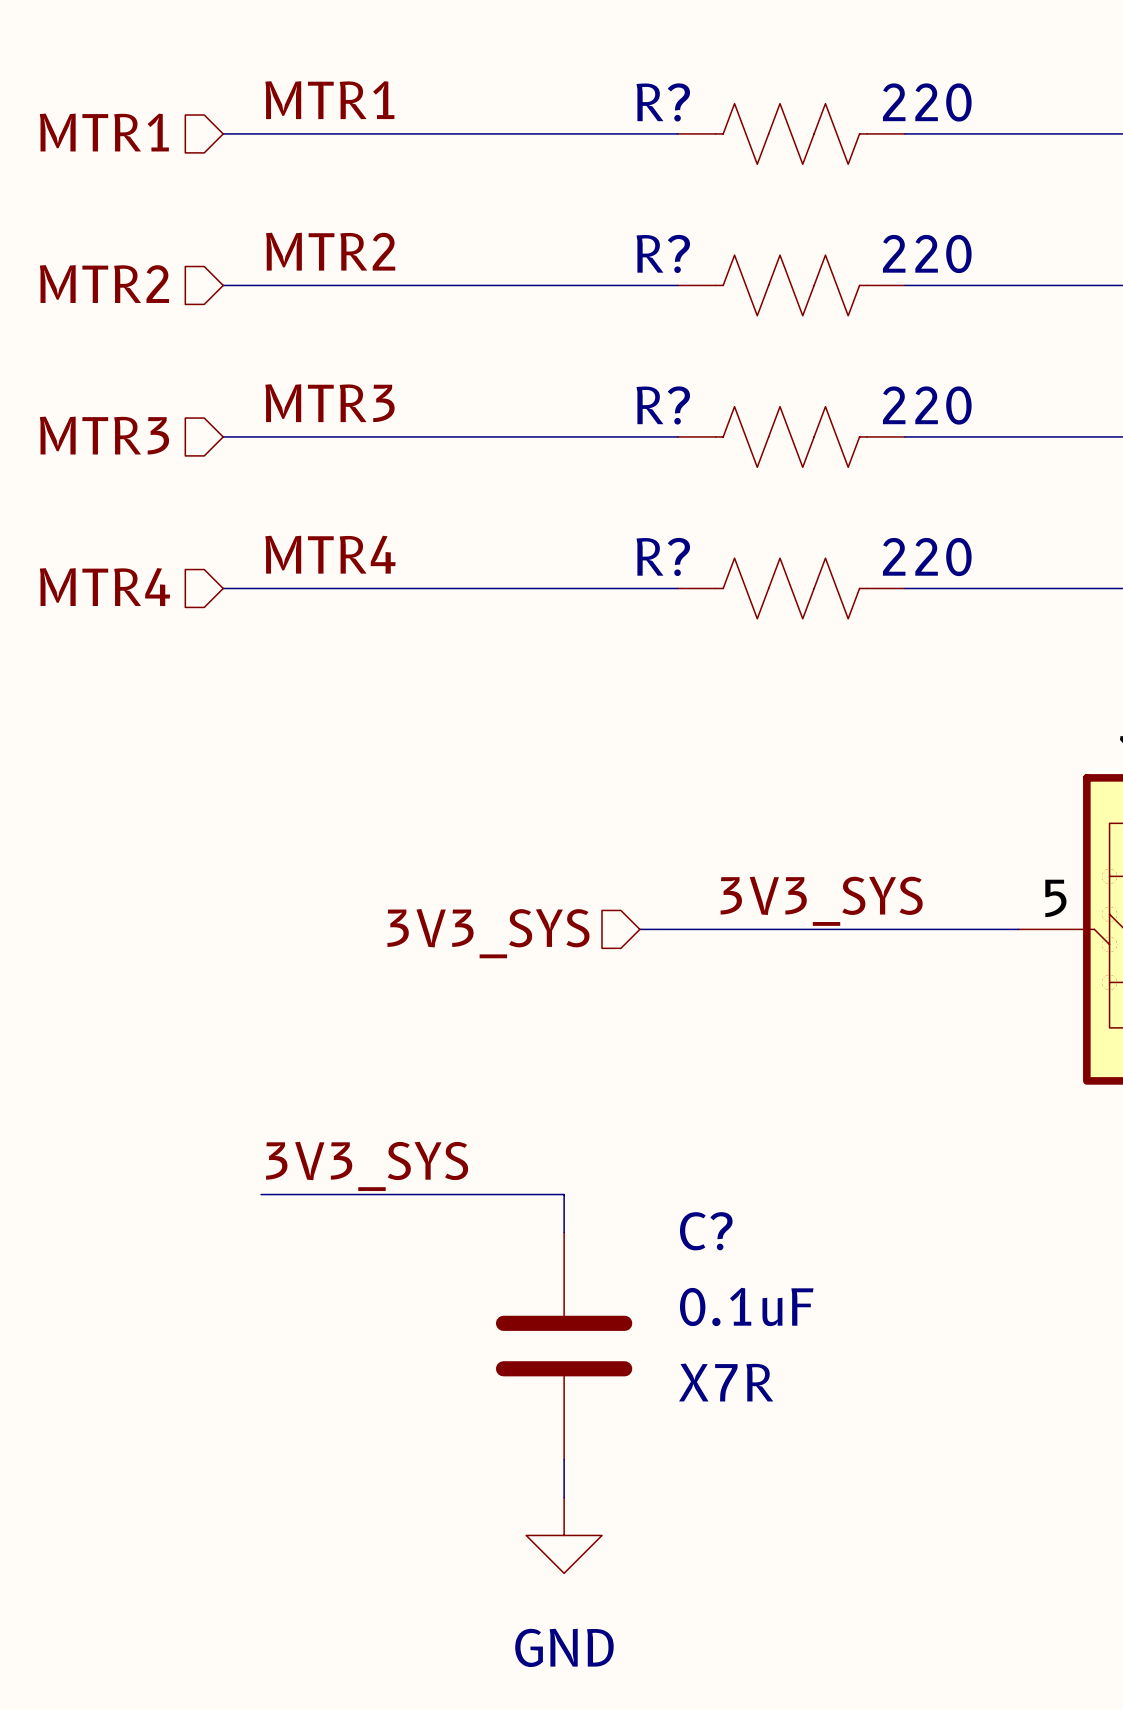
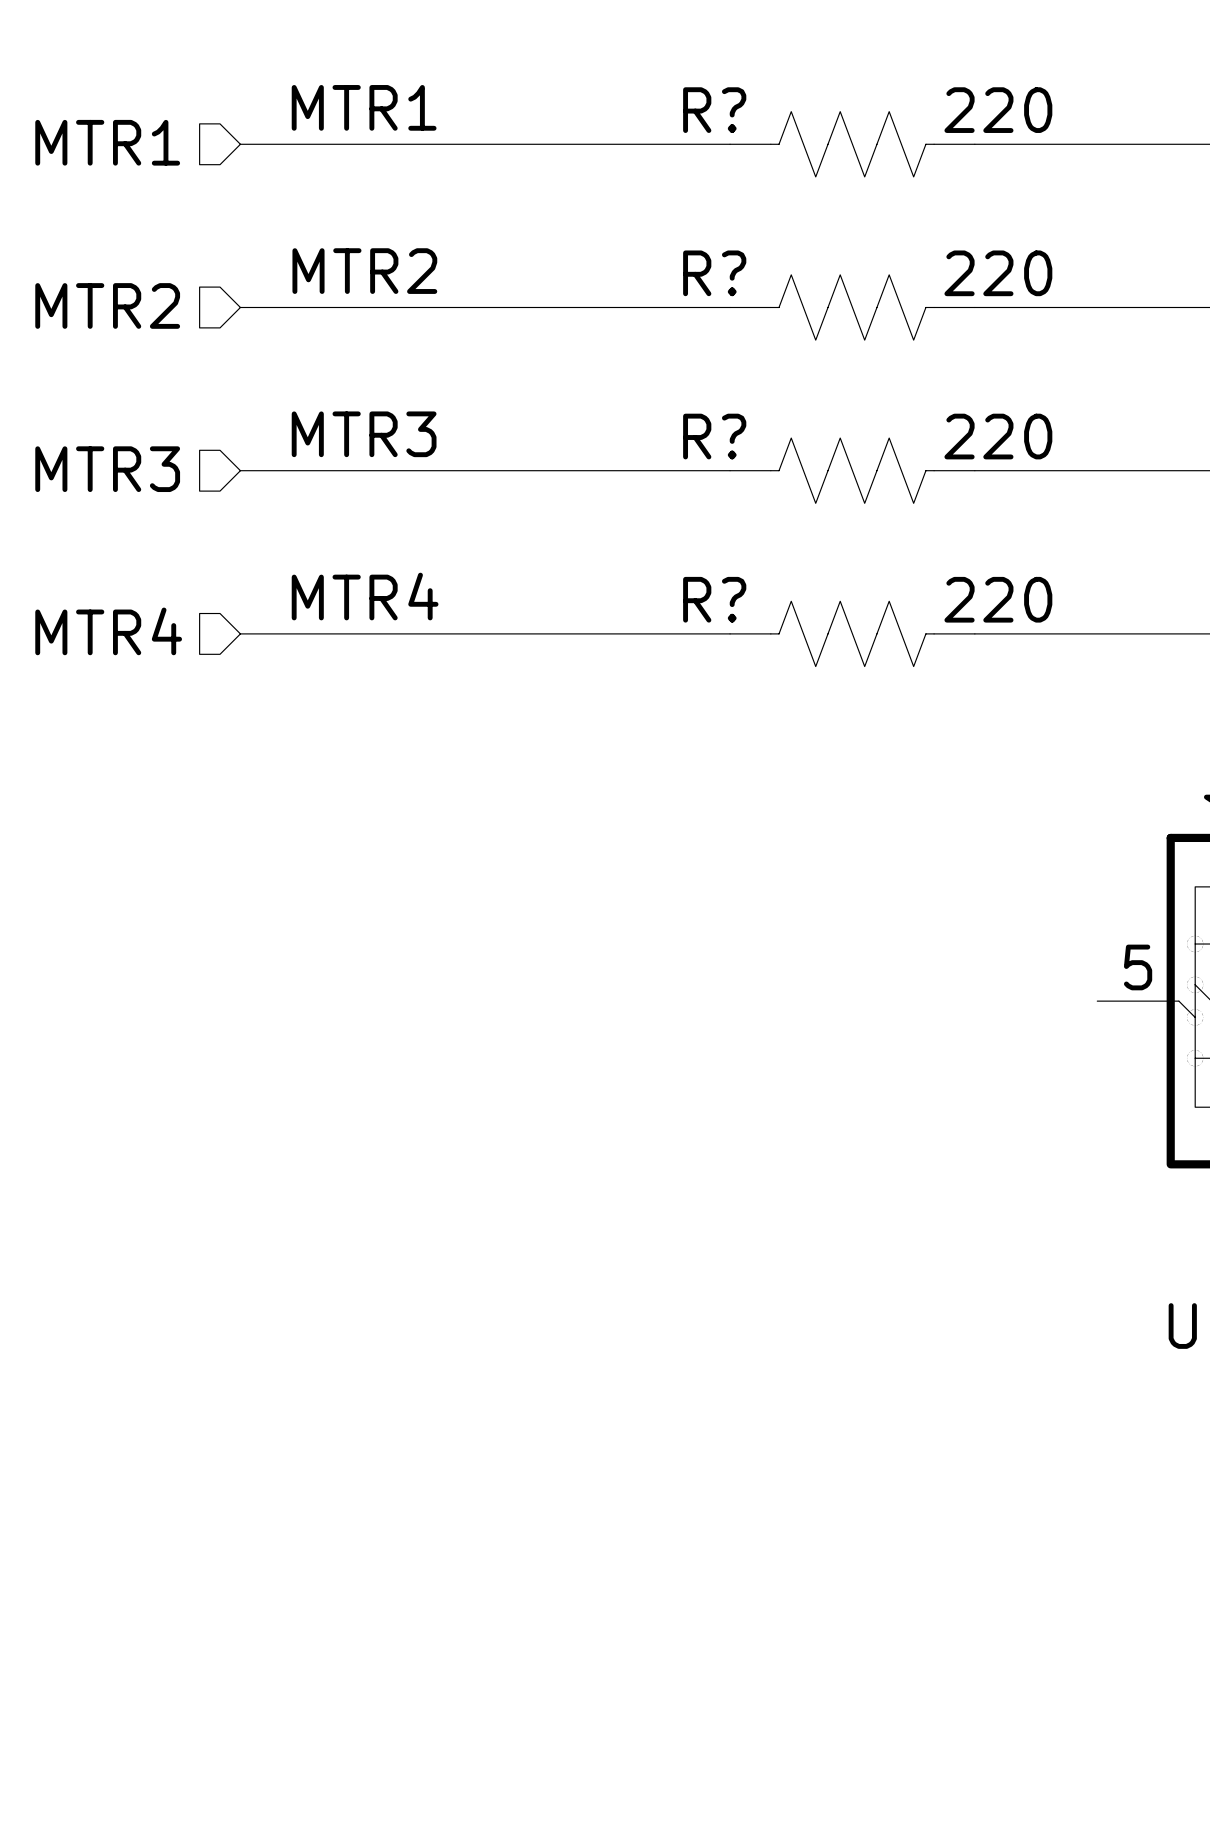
label: 3V3_SYS (821, 901) -> none
wire: (639, 929) (1018, 929) -> none
hierarchical label: 3V3_SYS (488, 933) -> none
label: 3V3_SYS (367, 1166) -> none
wire: (261, 1194) (564, 1194) (564, 1232) -> none
C?: 0.1uF (564, 1346) -> none
wire: (564, 1459) (564, 1497) -> none
power symbol: GND (564, 1535) -> none

